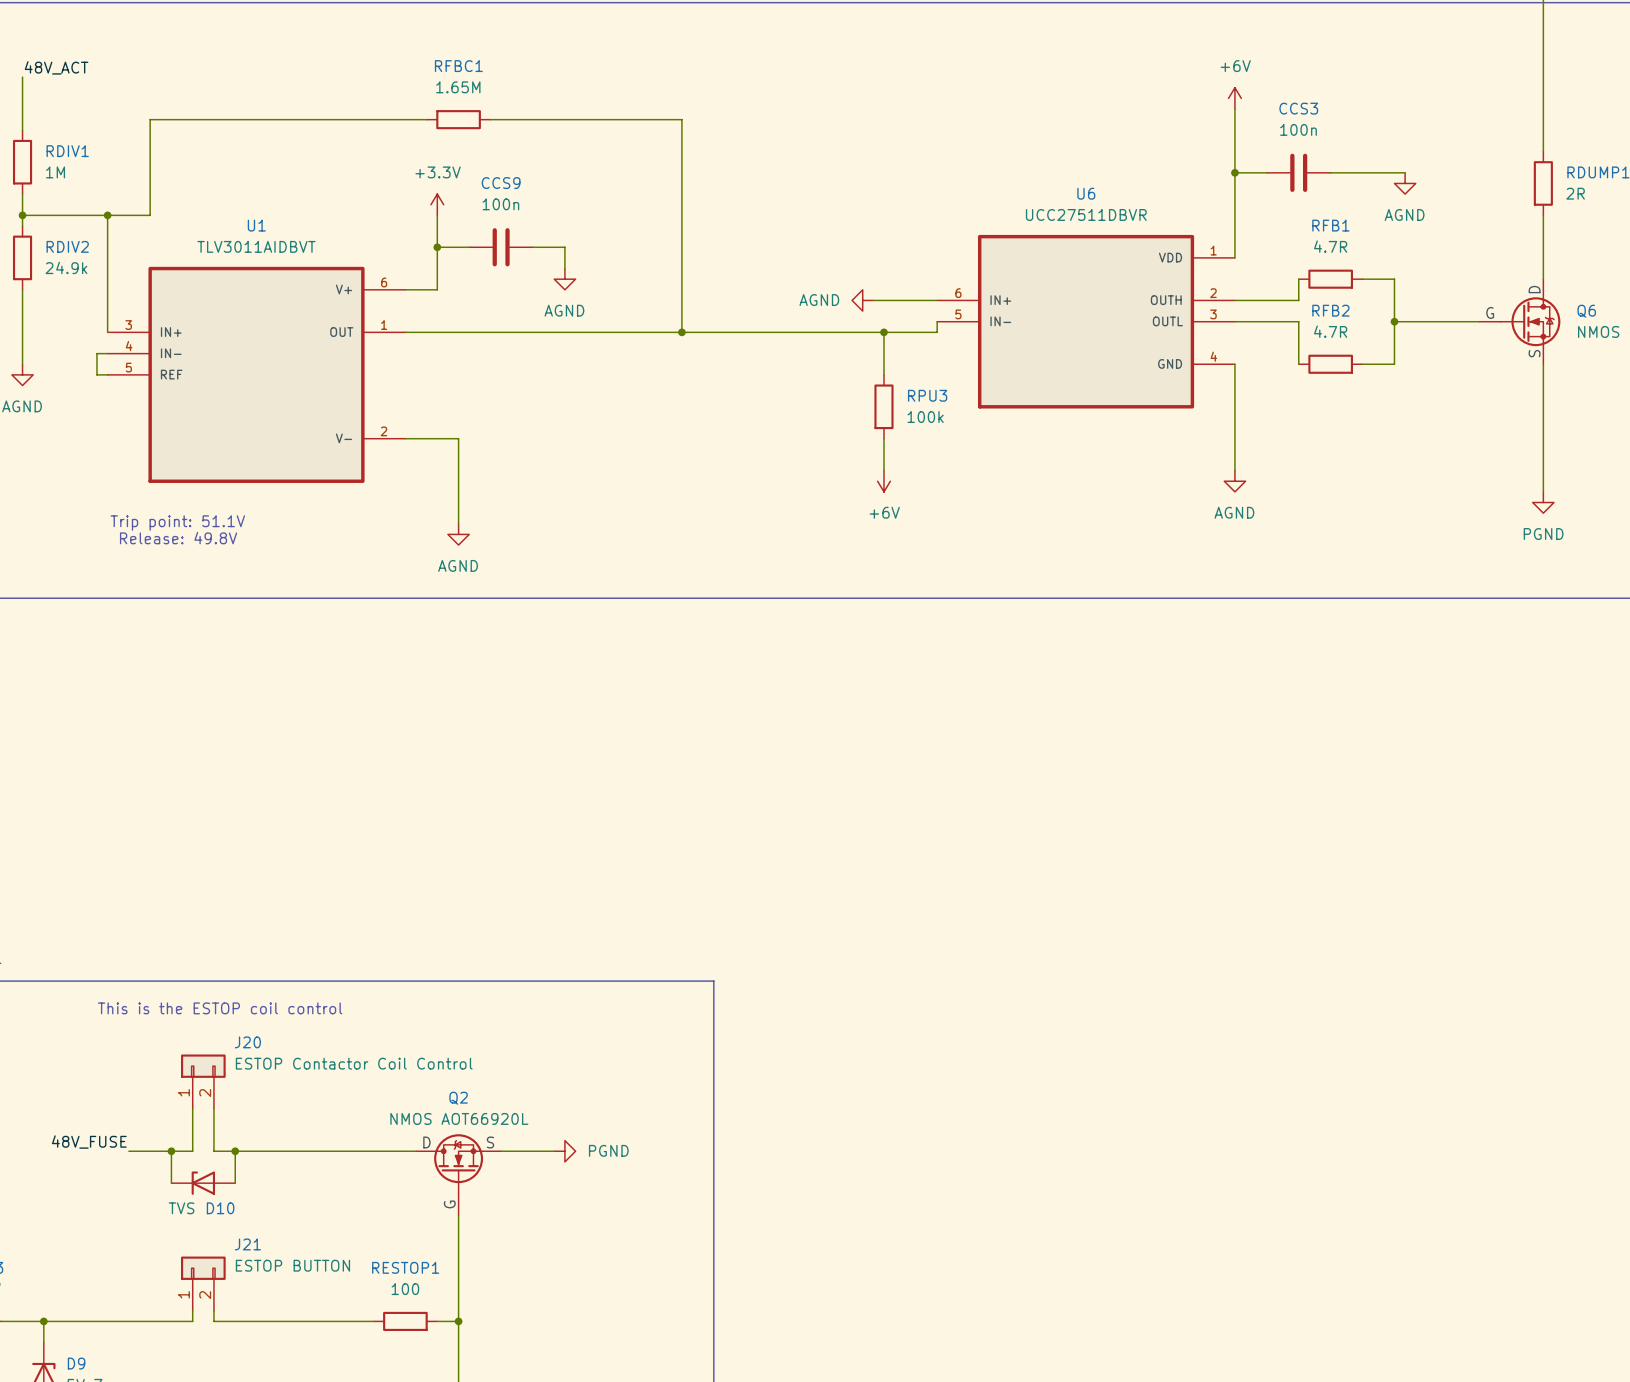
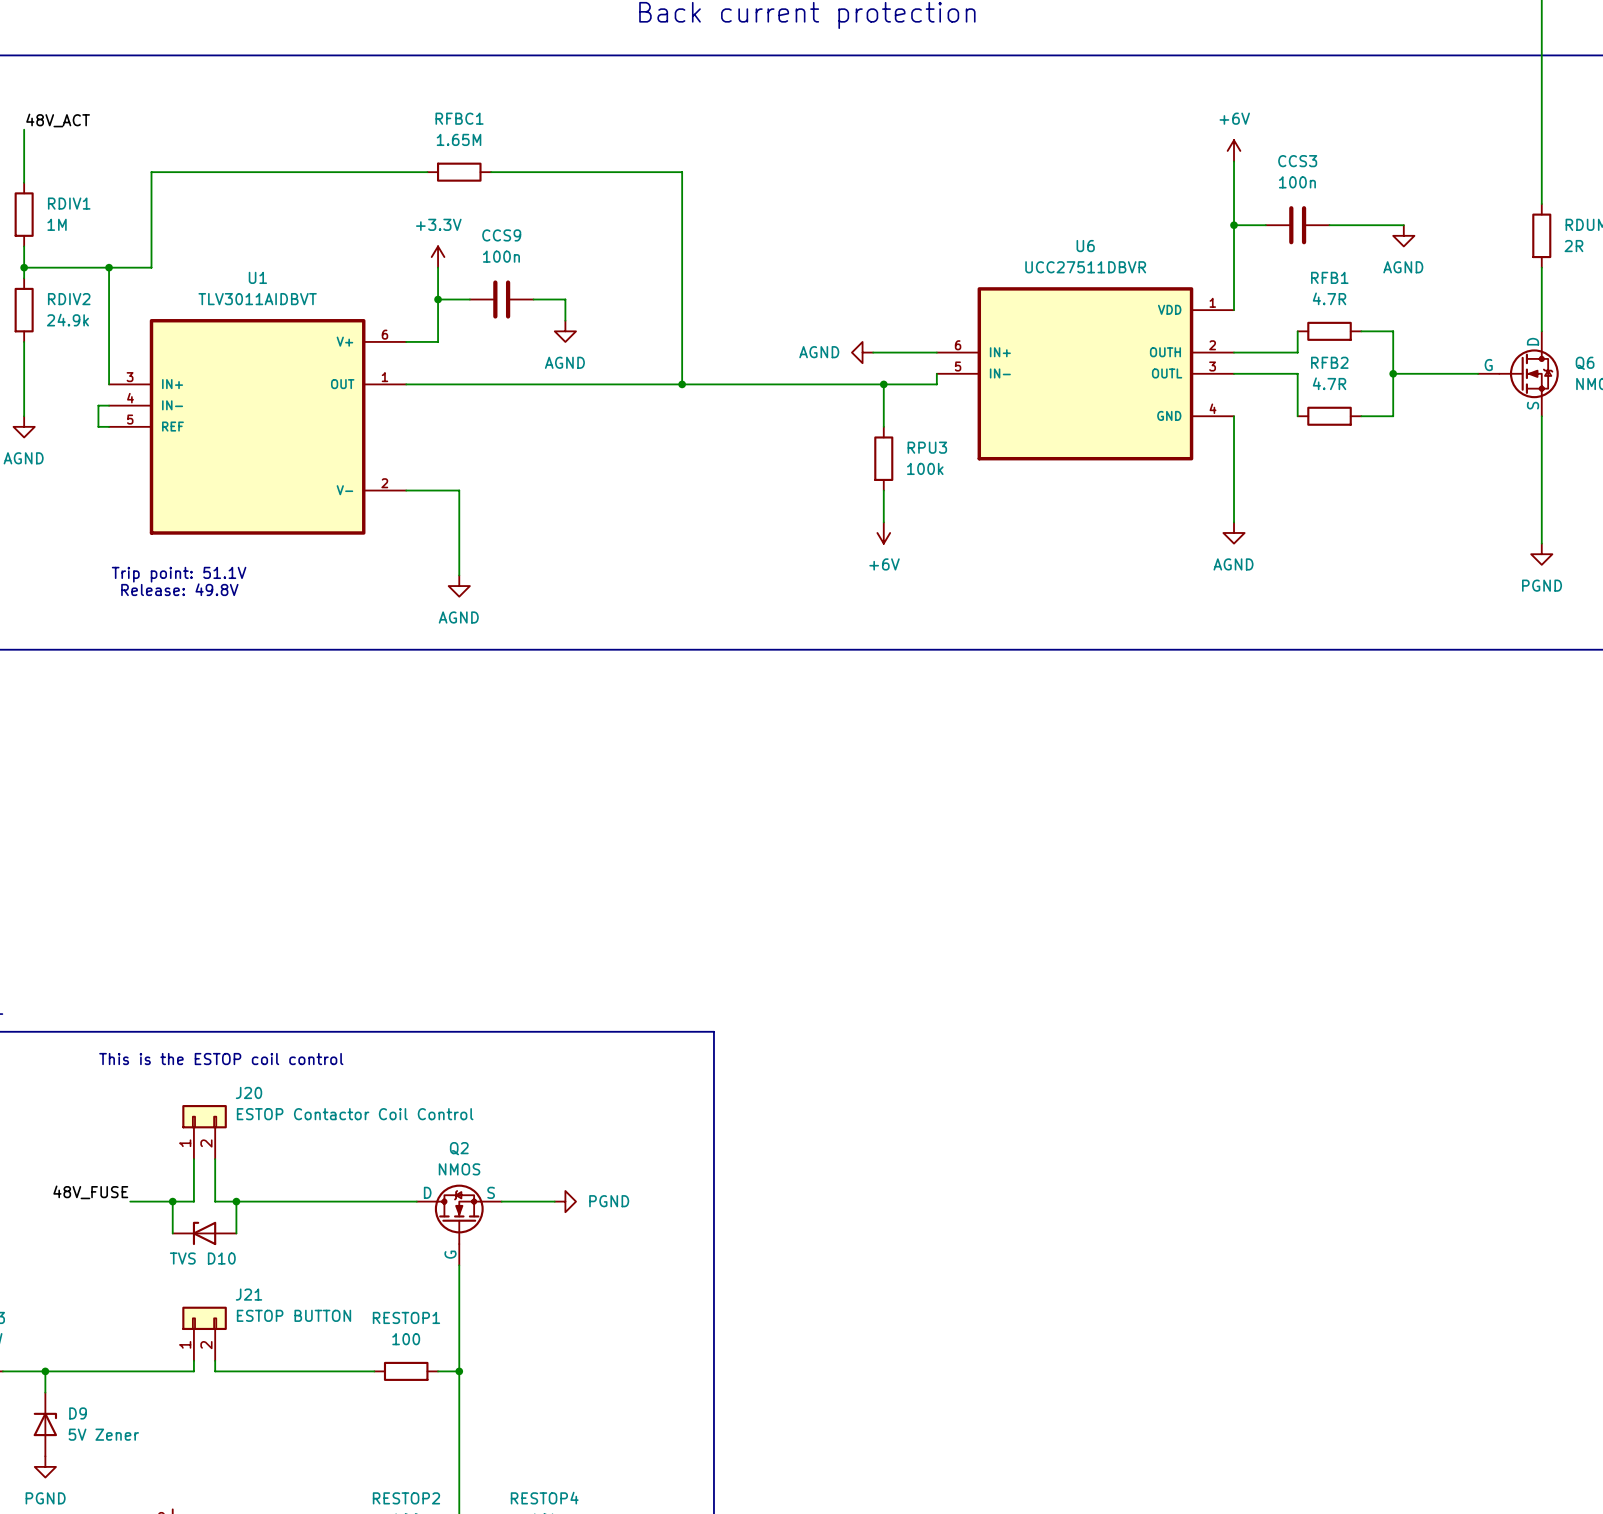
Q2 value: NMOS AOT66920L (459, 1118) -> NMOS (459, 1169)

